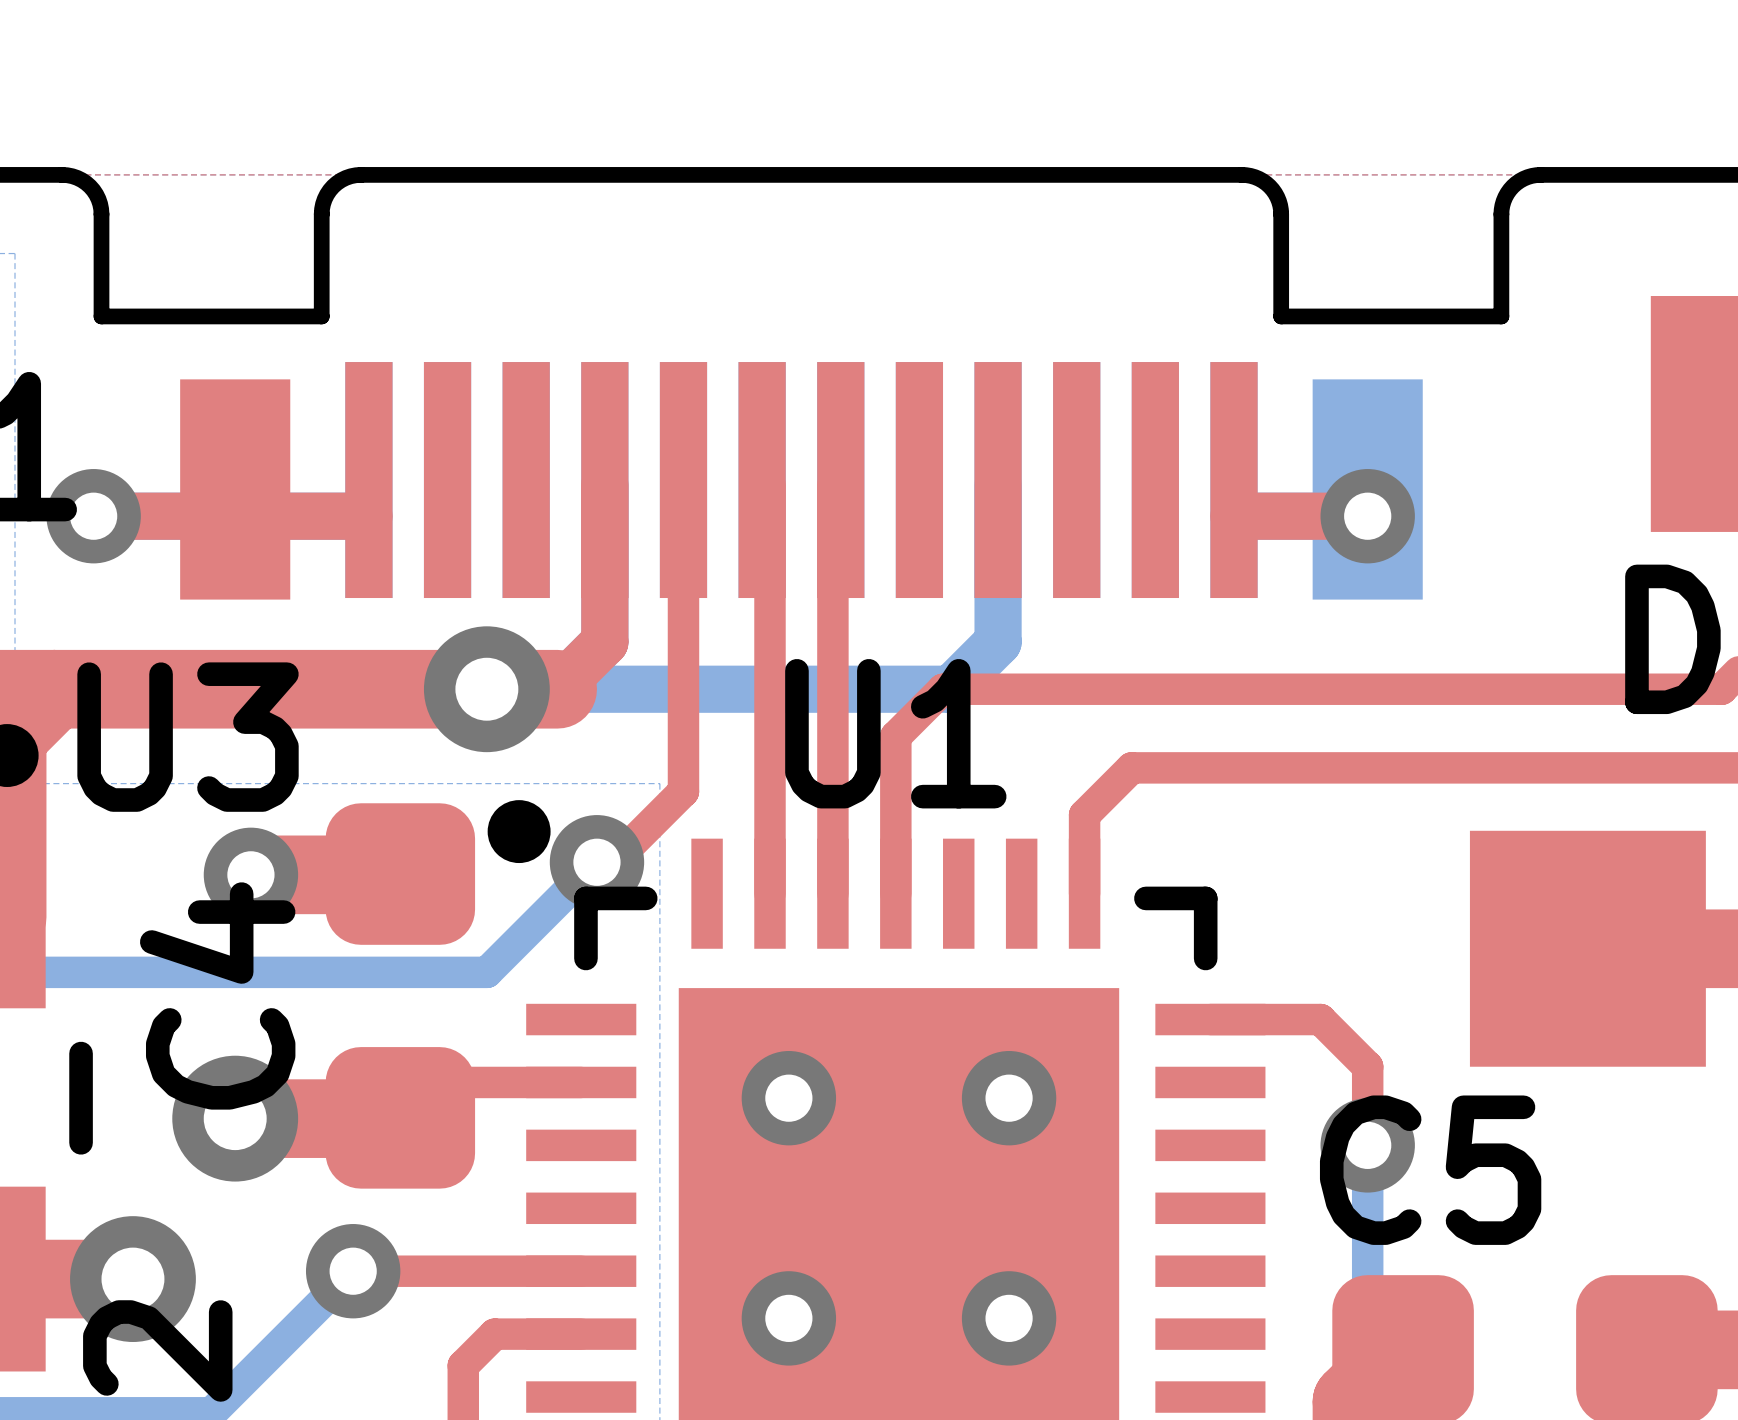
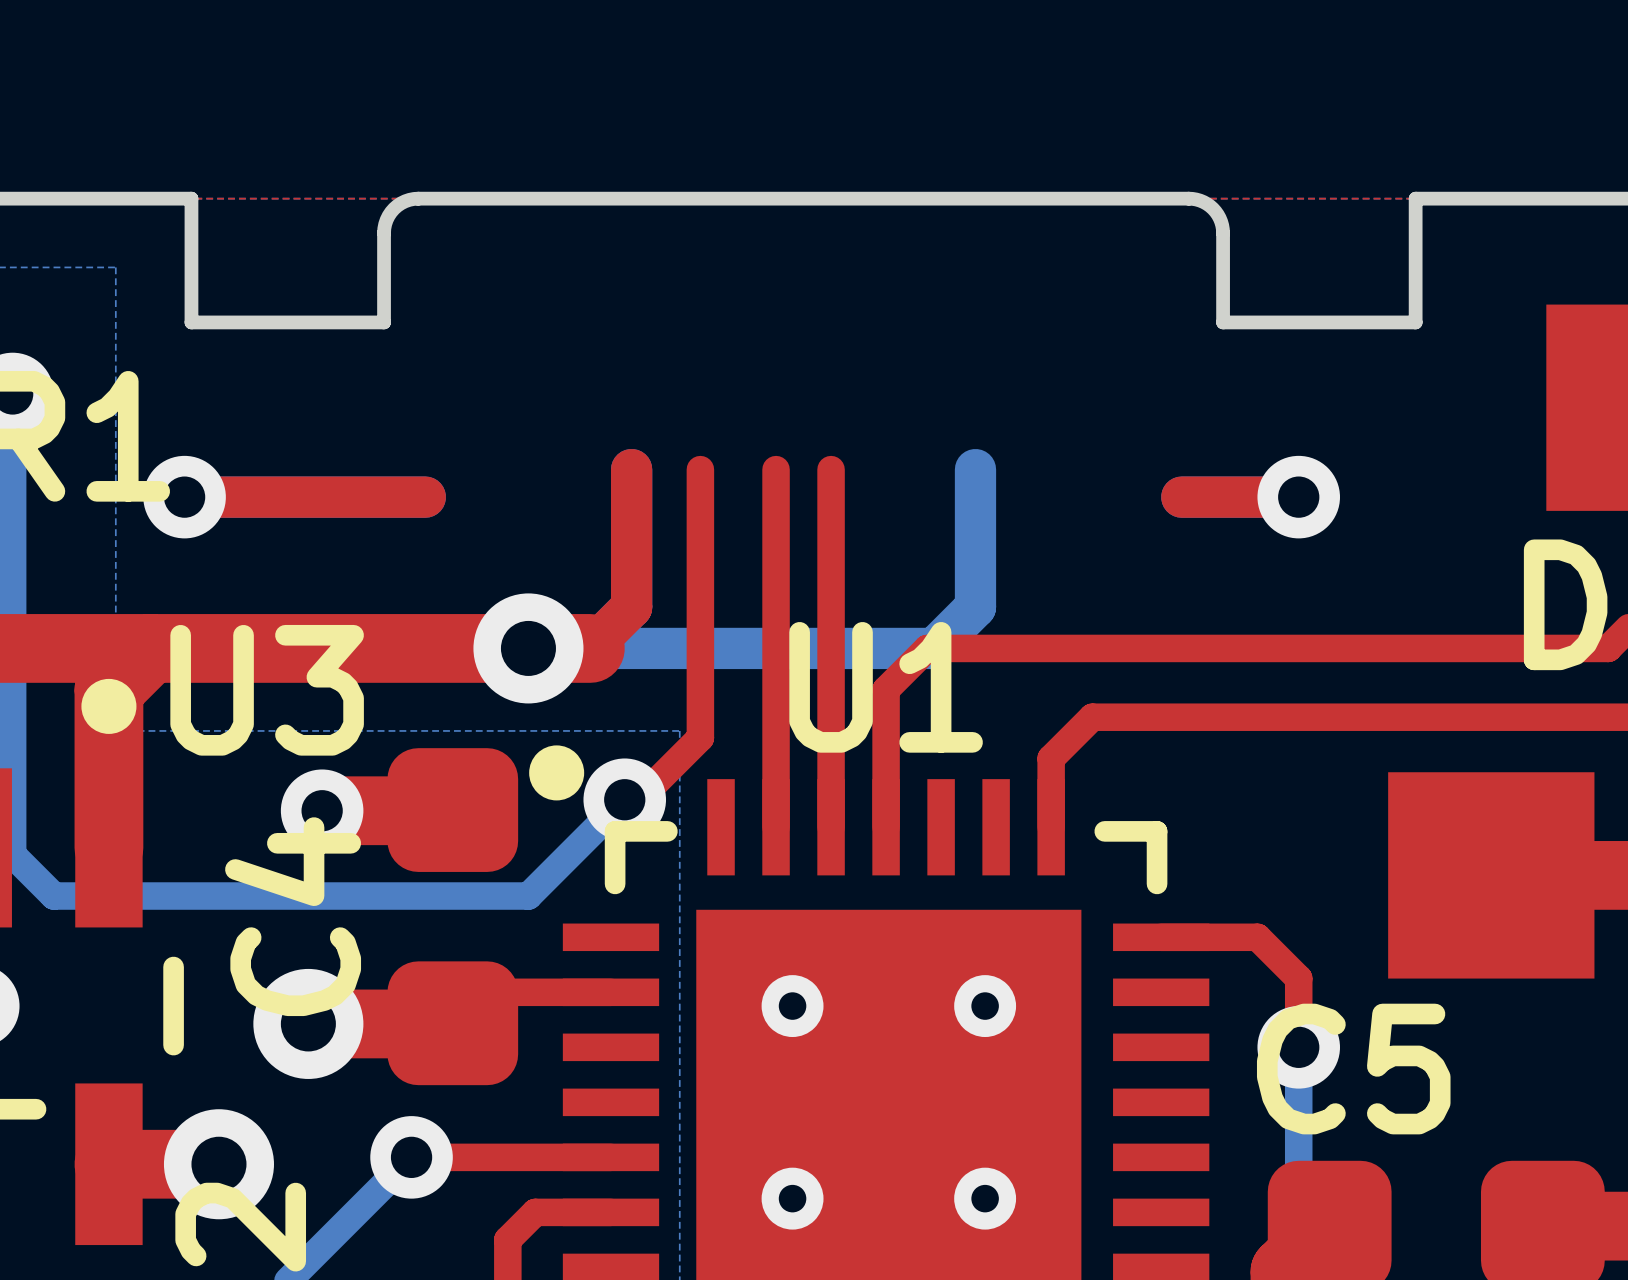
board edge: (62, 174) (77, 177) (89, 186) (98, 199) (101, 214) -> (157, 198) (191, 198) (191, 233)
board edge: (1540, 174) (1523, 178) (1512, 186) (1503, 201) (1501, 214) -> (1450, 198) (1415, 198) (1415, 233)
part: (801, 480) -> none
via size: [741, 1051, 837, 1146] -> [761, 975, 824, 1038]
via size: [961, 1051, 1057, 1146] -> [954, 975, 1017, 1038]
via size: [741, 1271, 837, 1366] -> [761, 1167, 824, 1230]
via size: [961, 1271, 1057, 1366] -> [954, 1167, 1017, 1230]

